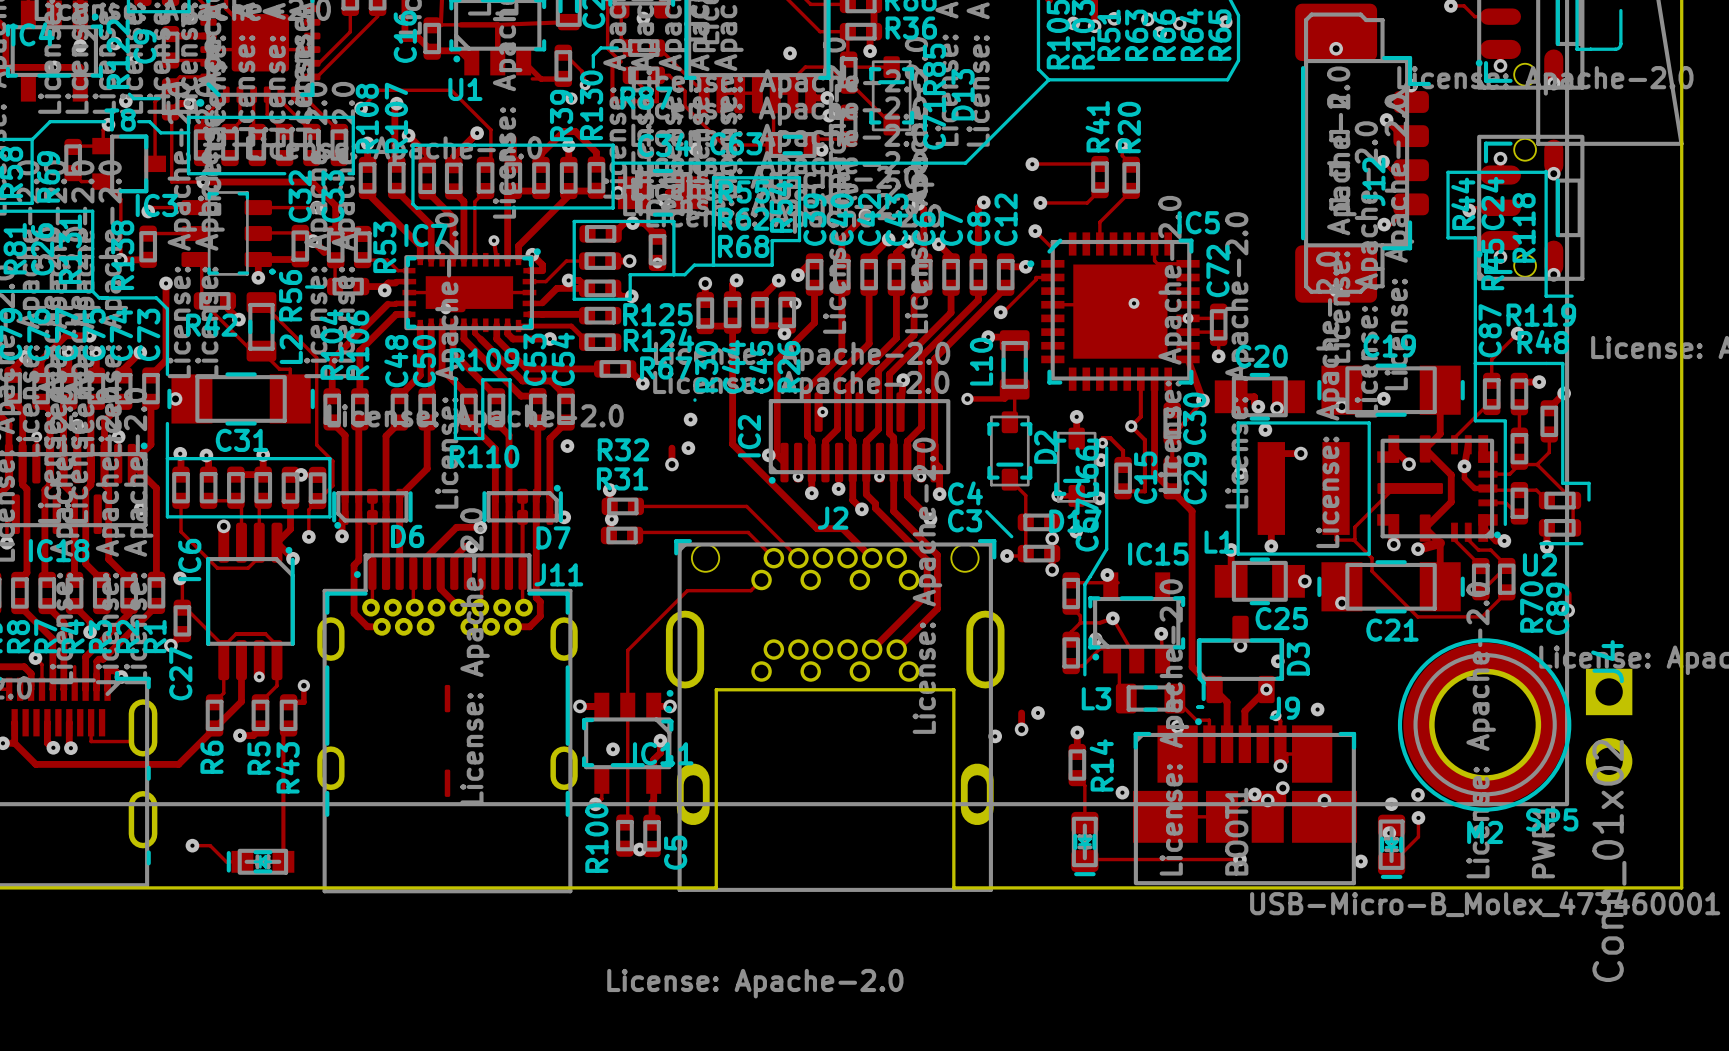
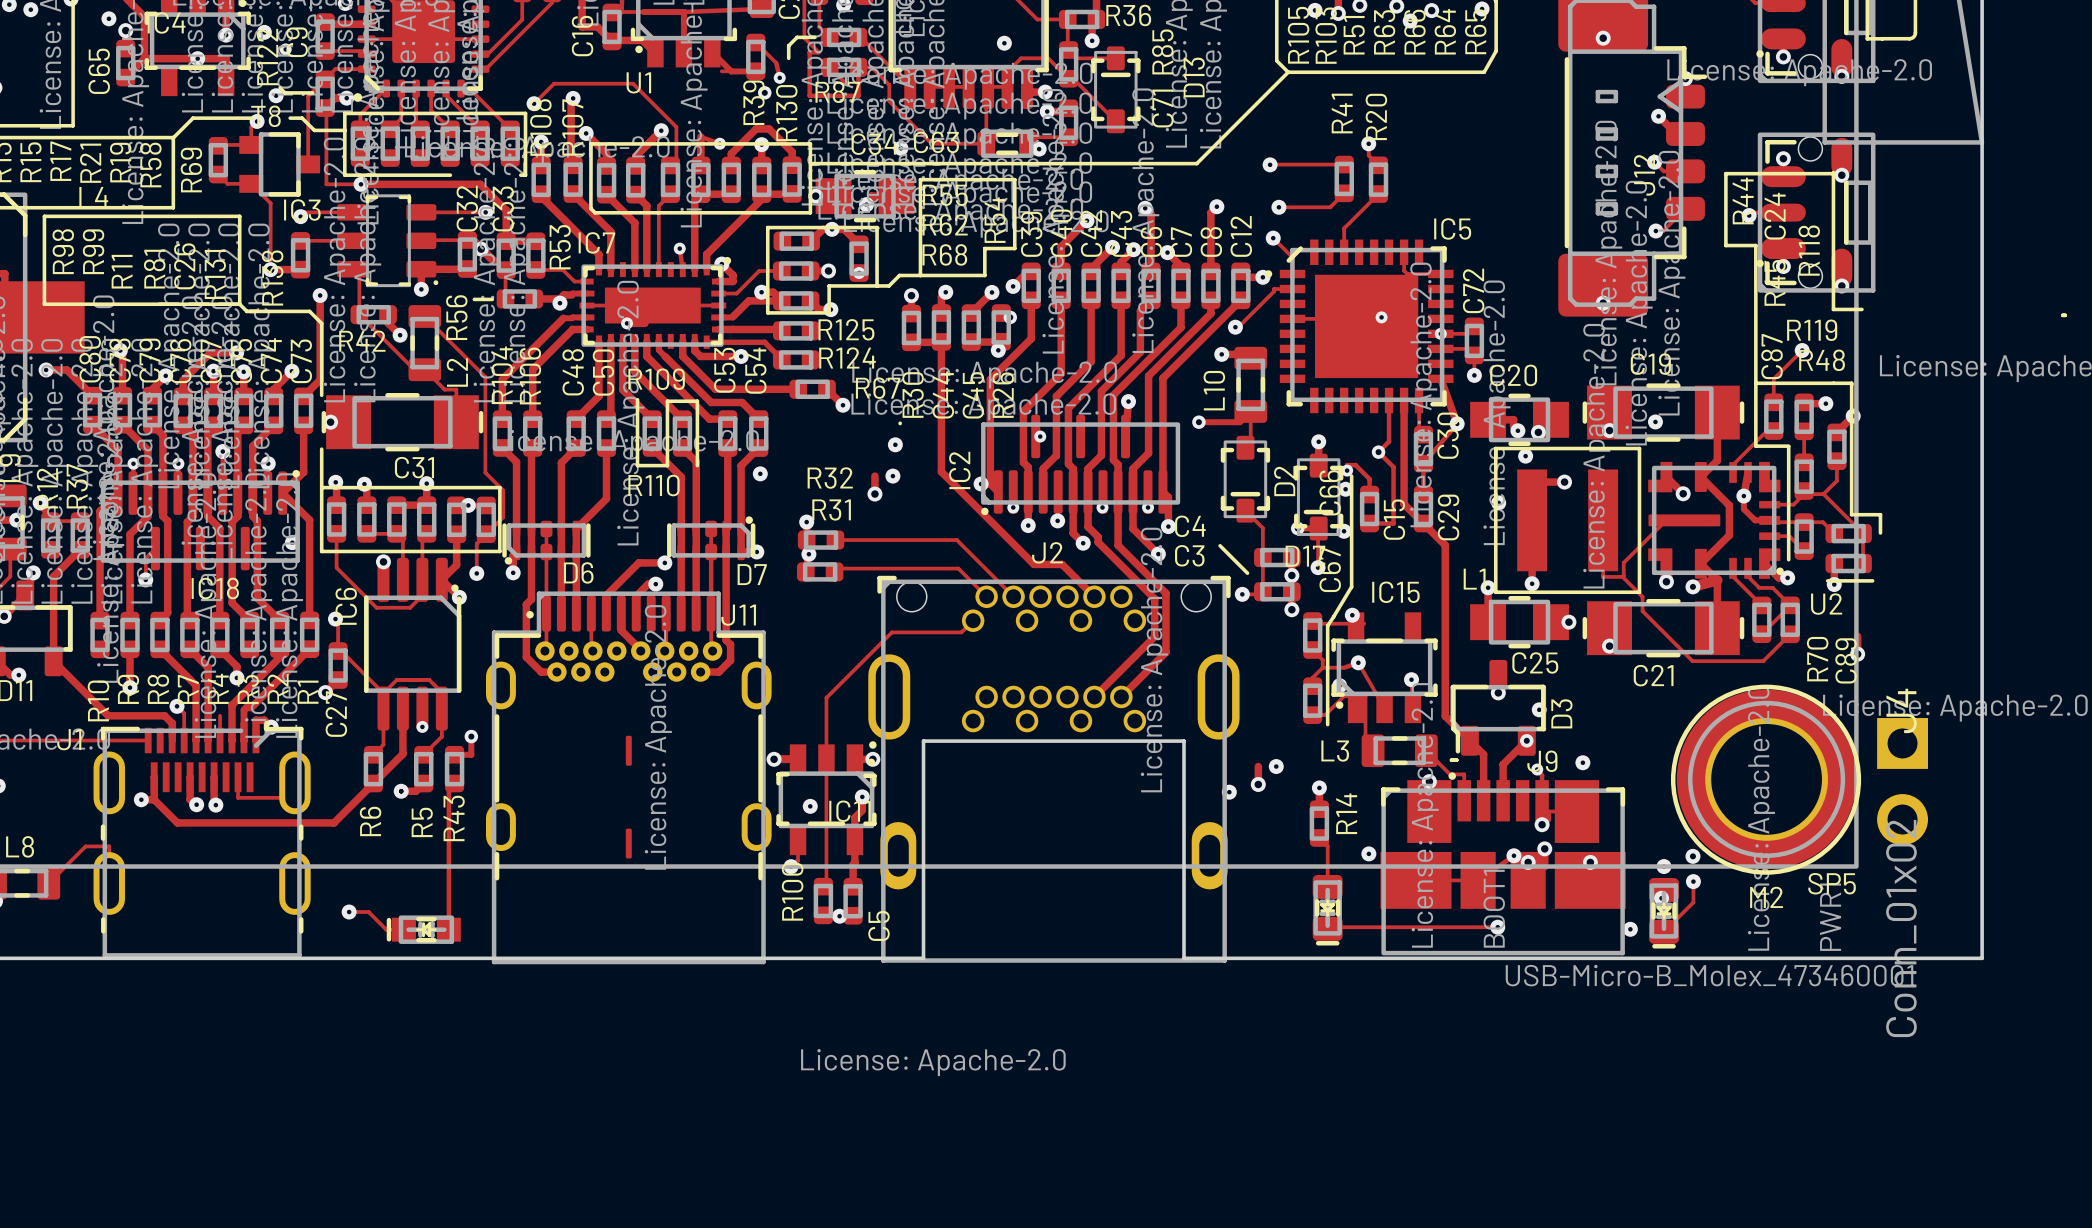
track: none -> (700, 136) (719, 143)
via: none -> (719, 143)

